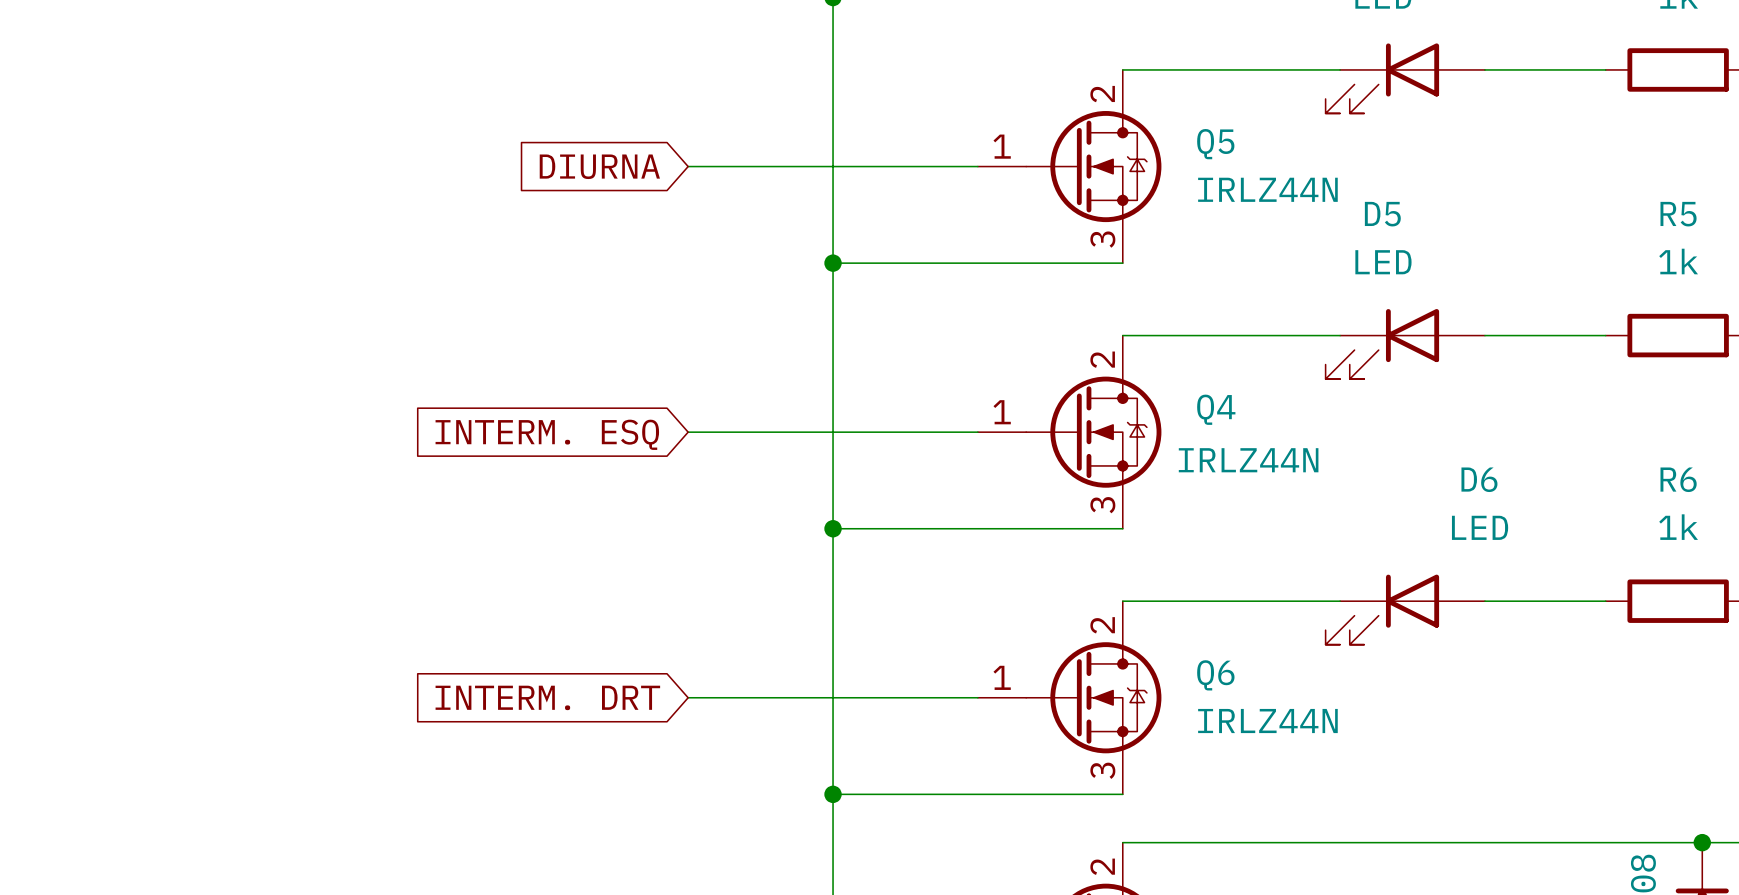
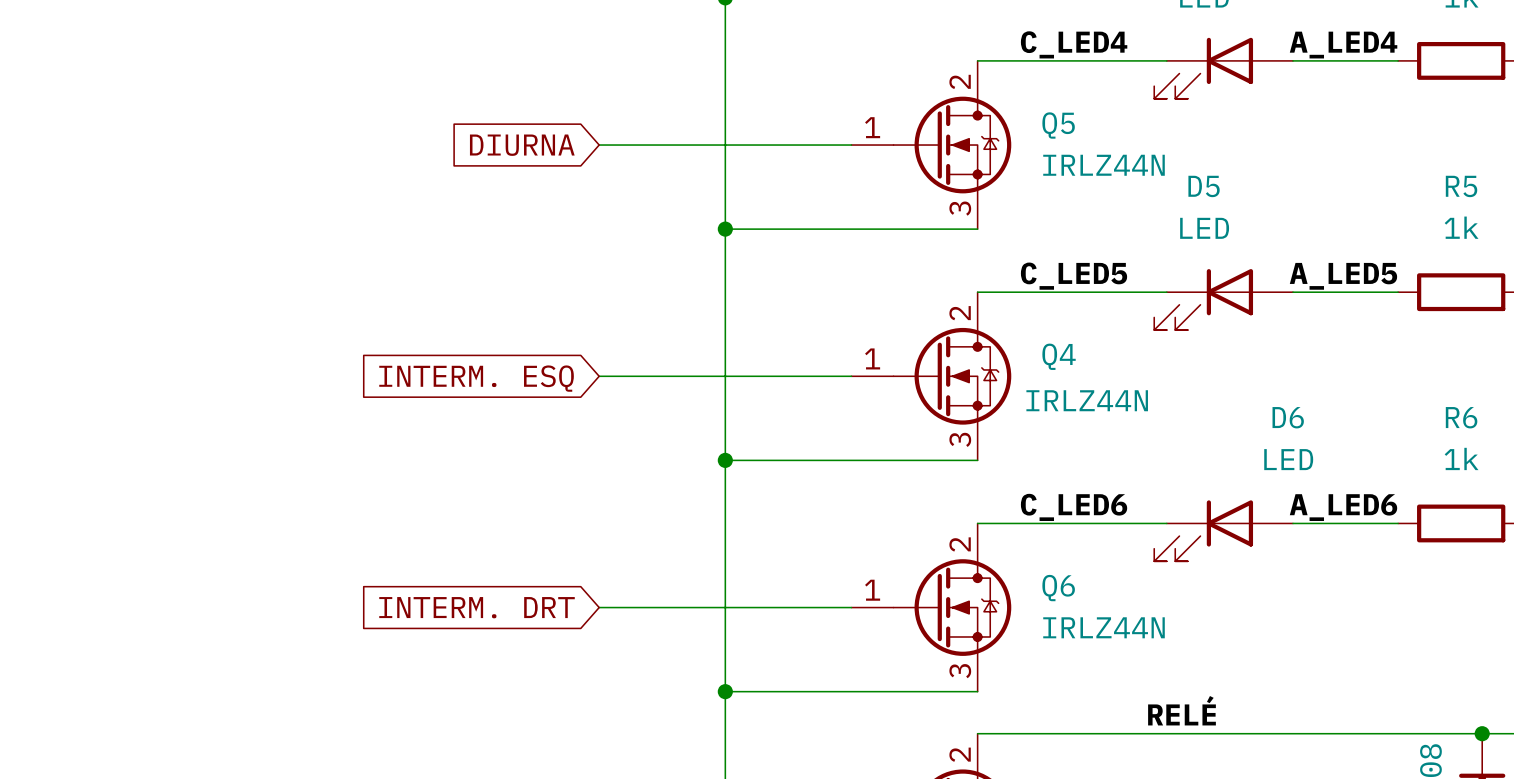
label: none -> C_LED4 (1074, 44)
label: none -> A_LED4 (1343, 45)
label: none -> C_LED5 (1074, 276)
label: none -> A_LED5 (1343, 276)
label: none -> C_LED6 (1074, 507)
label: none -> A_LED6 (1343, 507)
label: none -> RELÉ (1181, 710)

